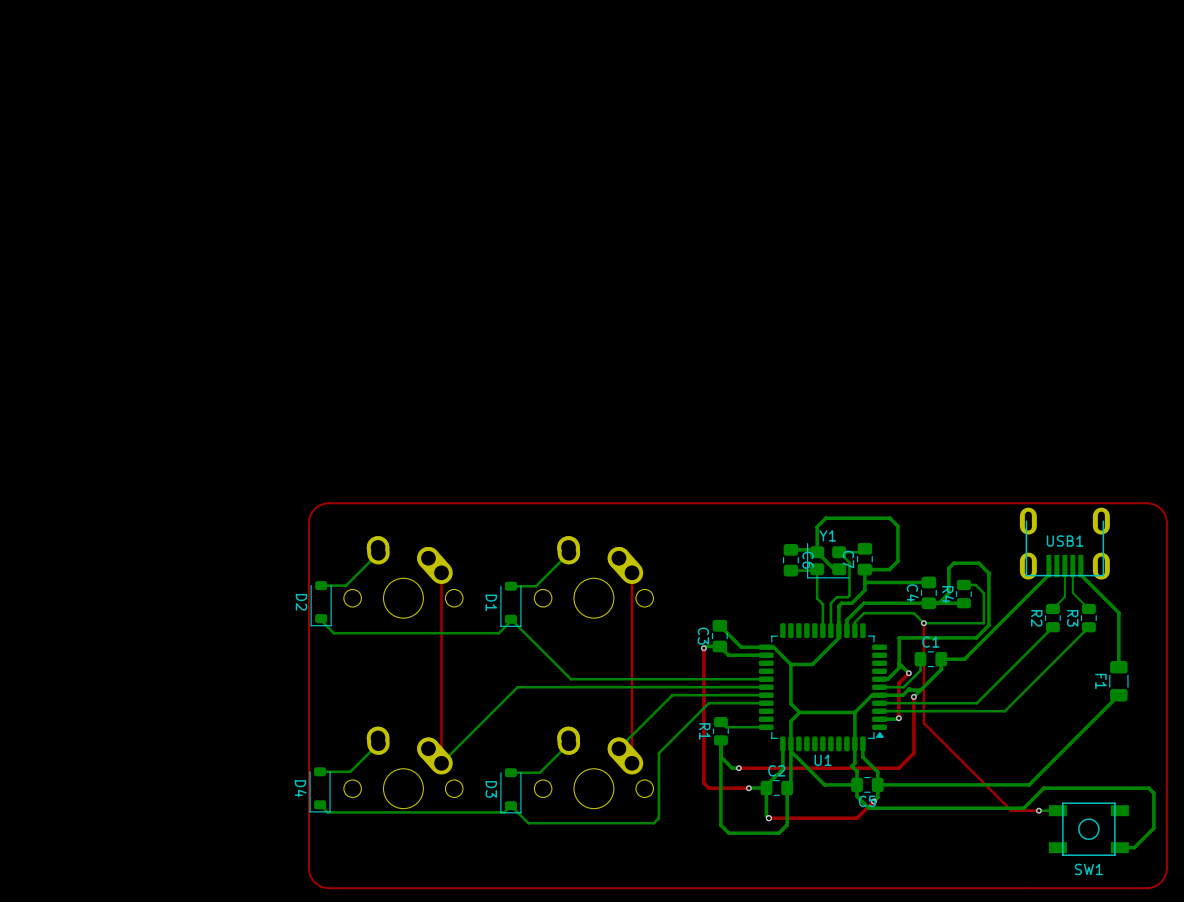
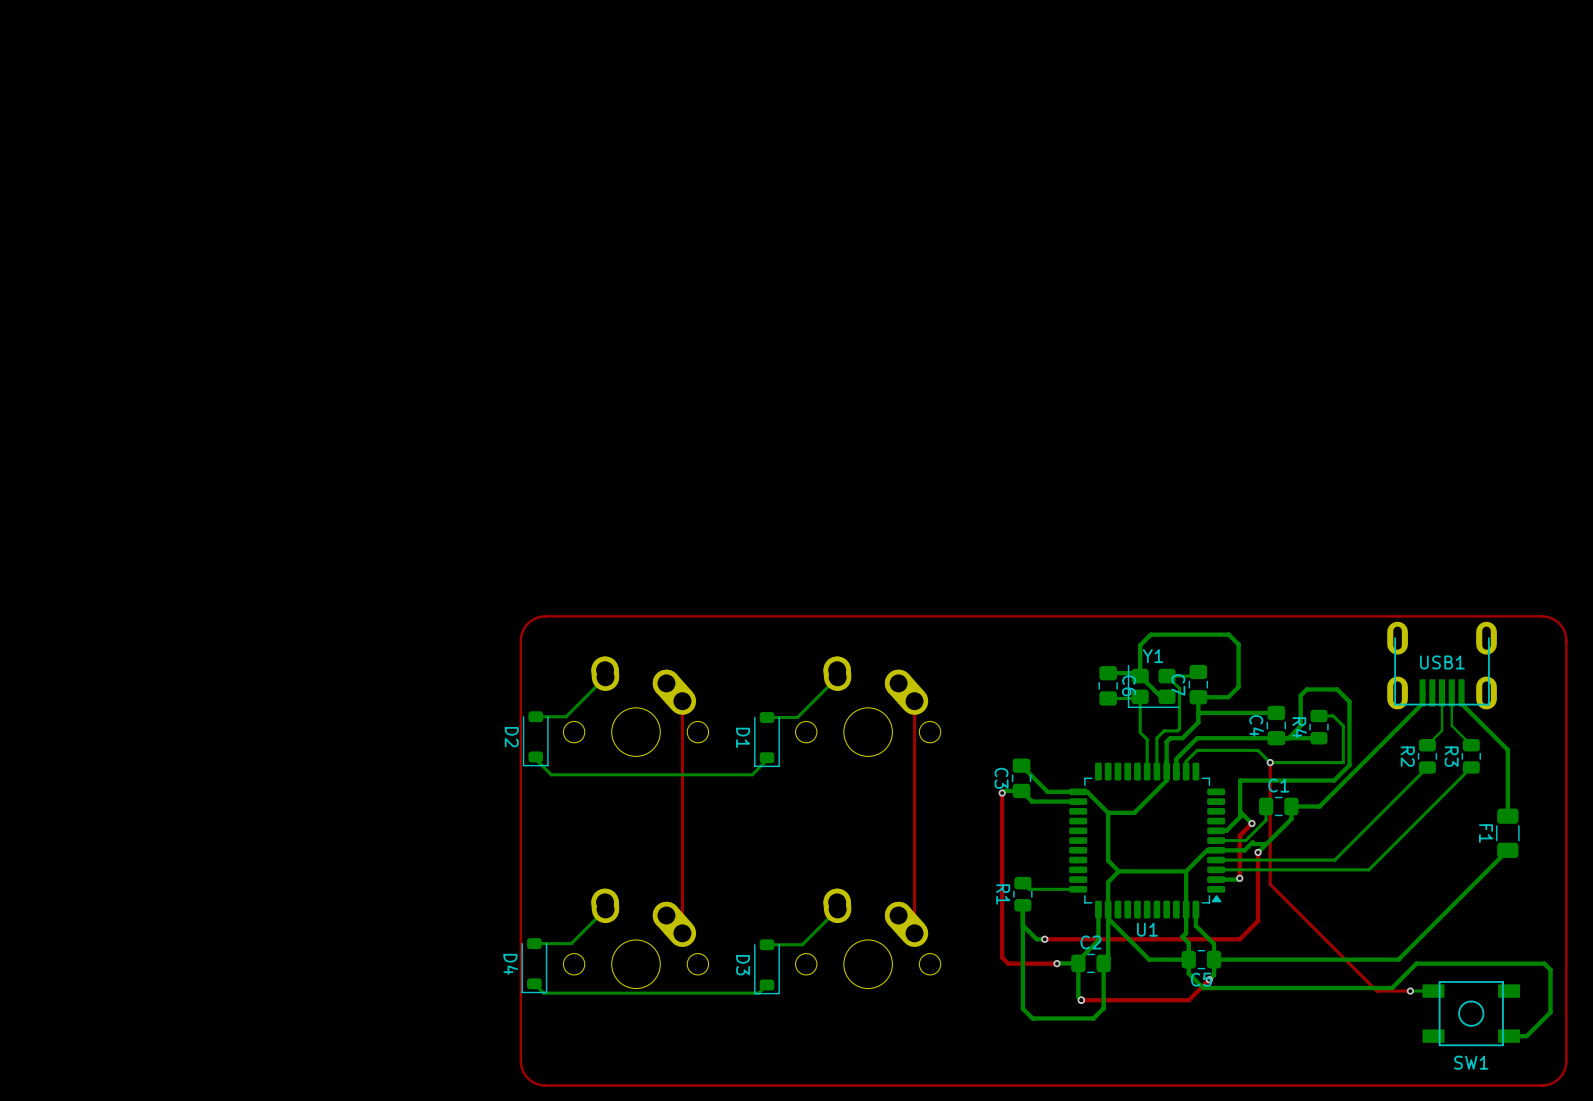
bottom track: (510, 619) (570, 679) (766, 679) -> none
bottom track: (766, 687) (517, 687) (441, 763) -> none
bottom track: (766, 695) (672, 695) (618, 748) -> none
bottom track: (766, 703) (708, 703) (658, 753) (658, 818) (653, 823) (528, 823) (510, 805) -> none

